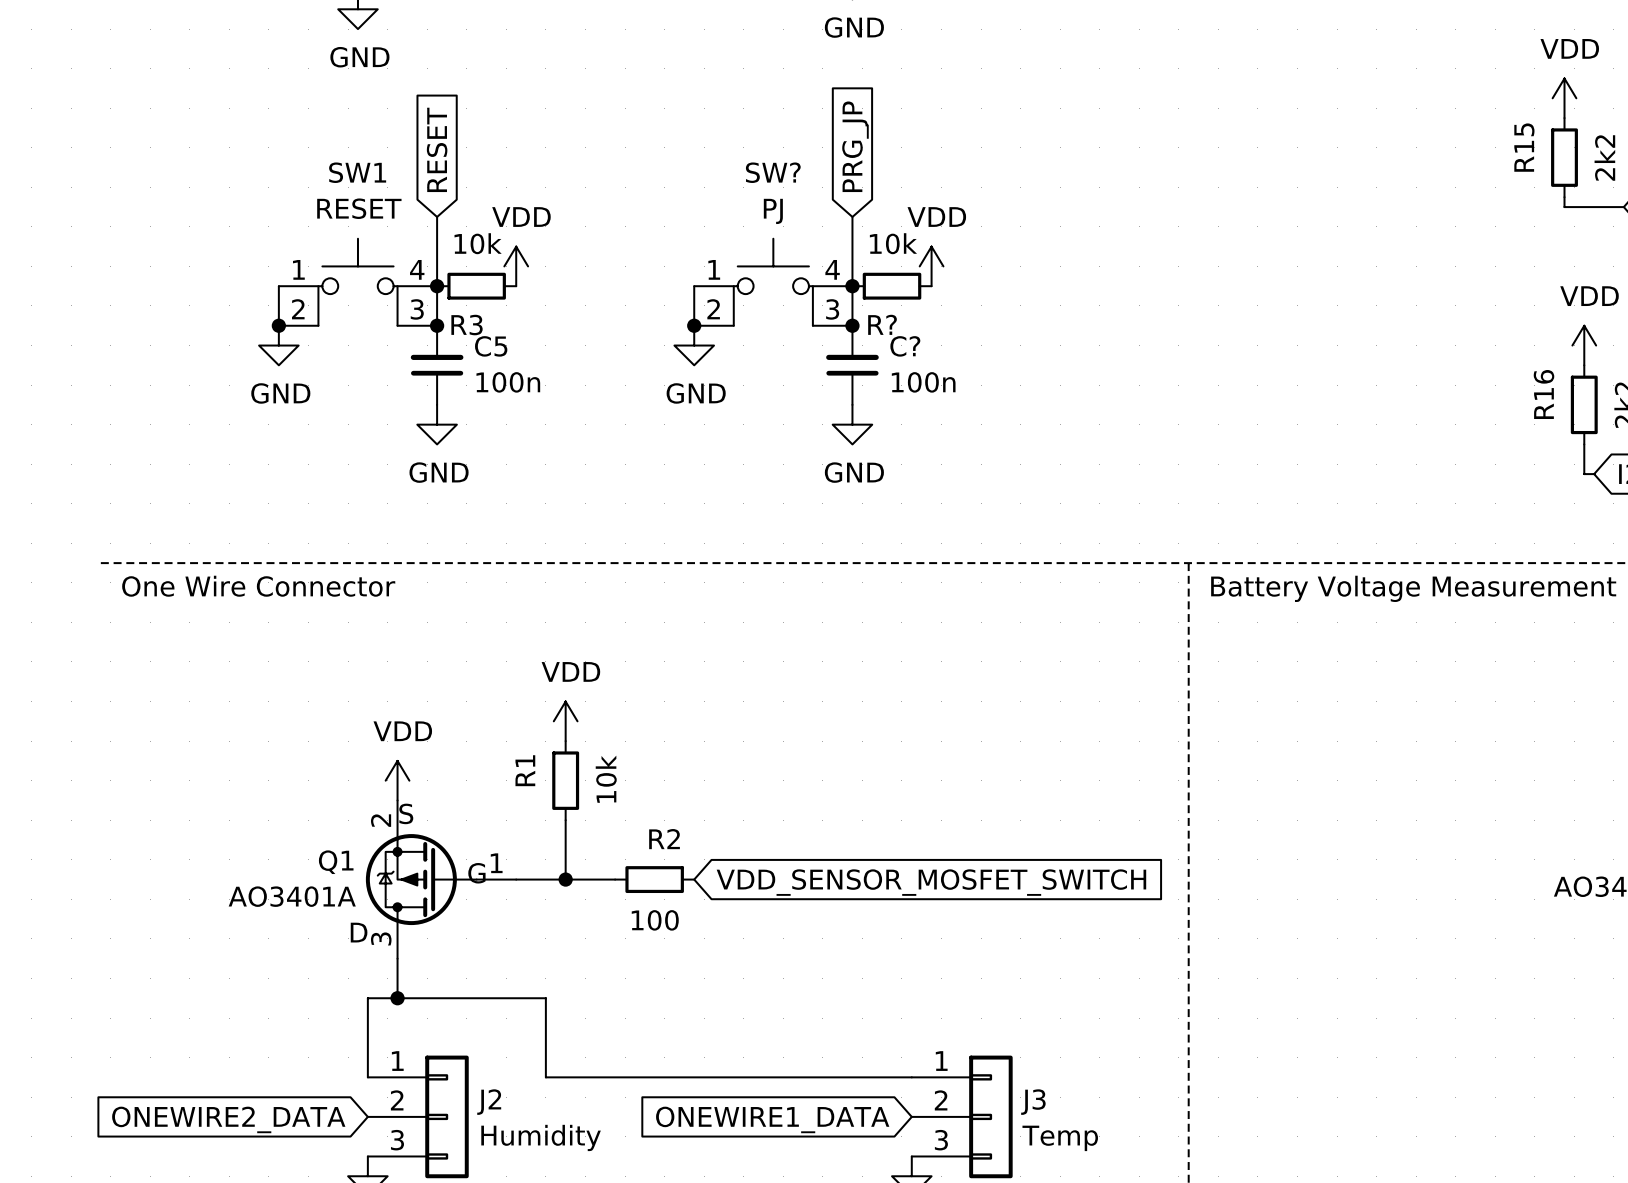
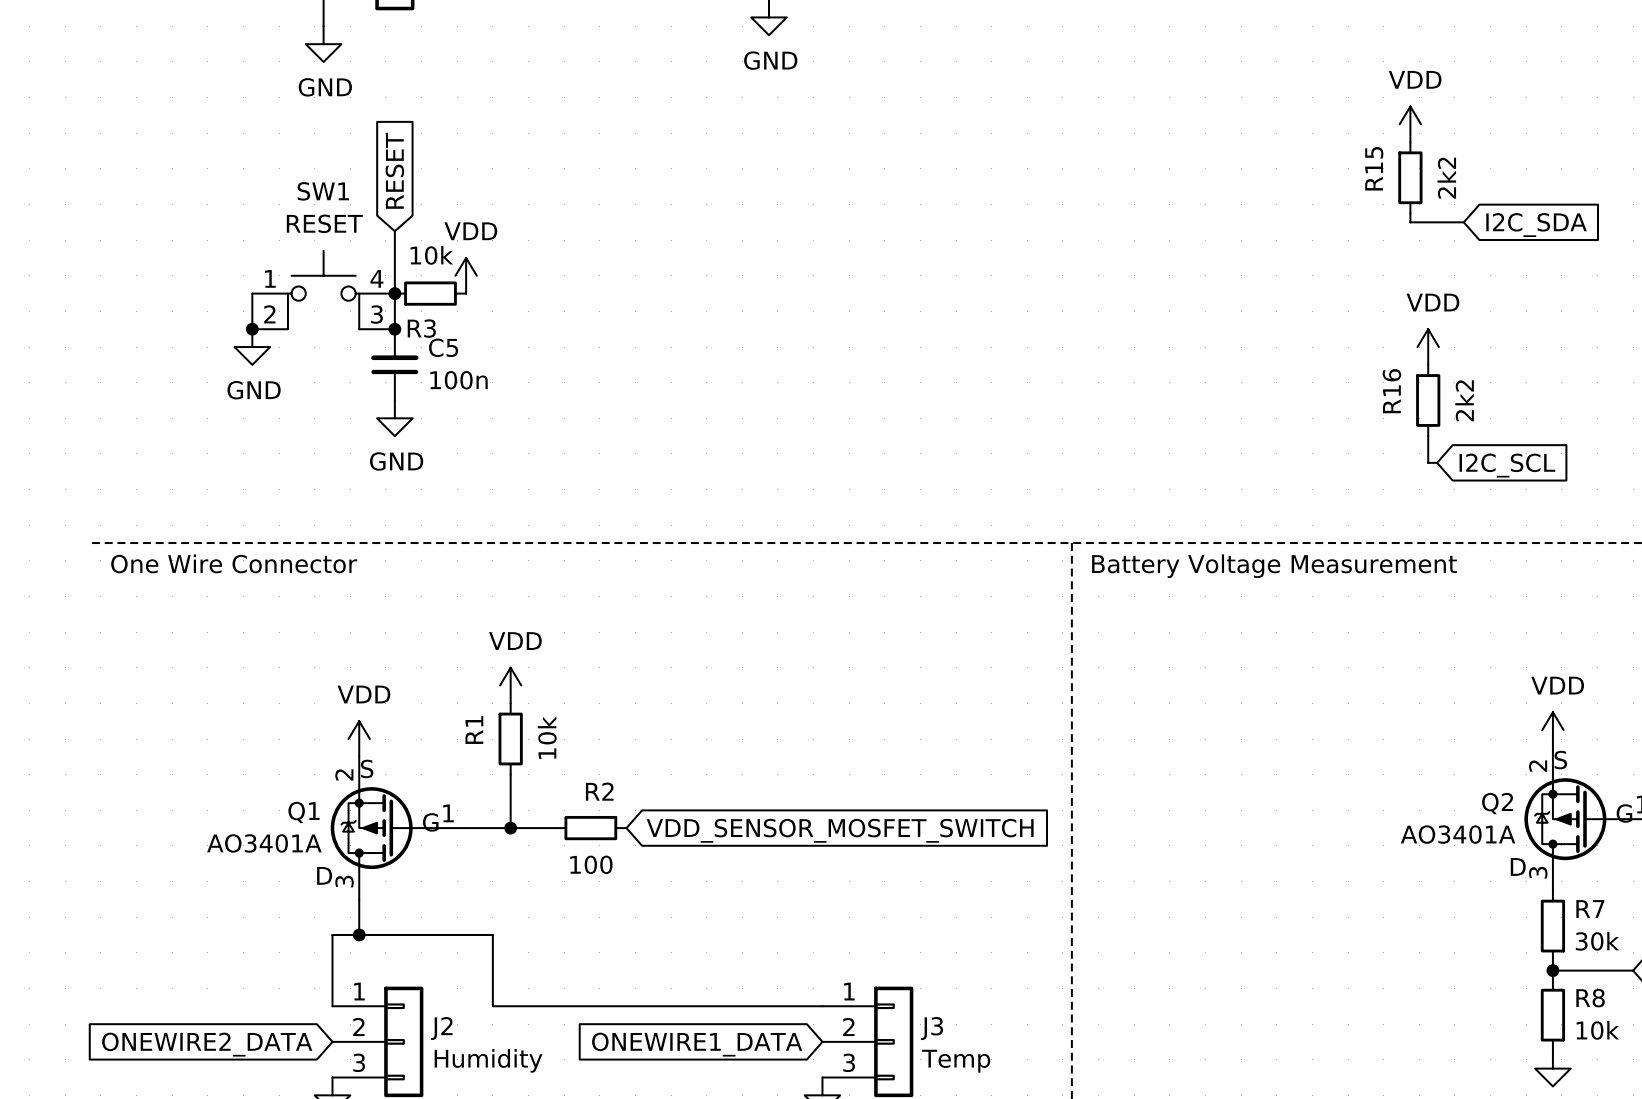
global label: PRG_JP (855, 146) -> none
wire: (852, 216) (852, 325) -> none
power symbol: VDD (931, 266) -> none
SW?: PJ (773, 282) -> none
wire: (694, 286) (694, 325) -> none
junction: (852, 286) -> none
R?: 10k (892, 286) -> none
junction: (694, 325) -> none
junction: (852, 325) -> none
power symbol: GND (694, 345) -> none
C?: 100n (852, 365) -> none
power symbol: GND (852, 424) -> none

